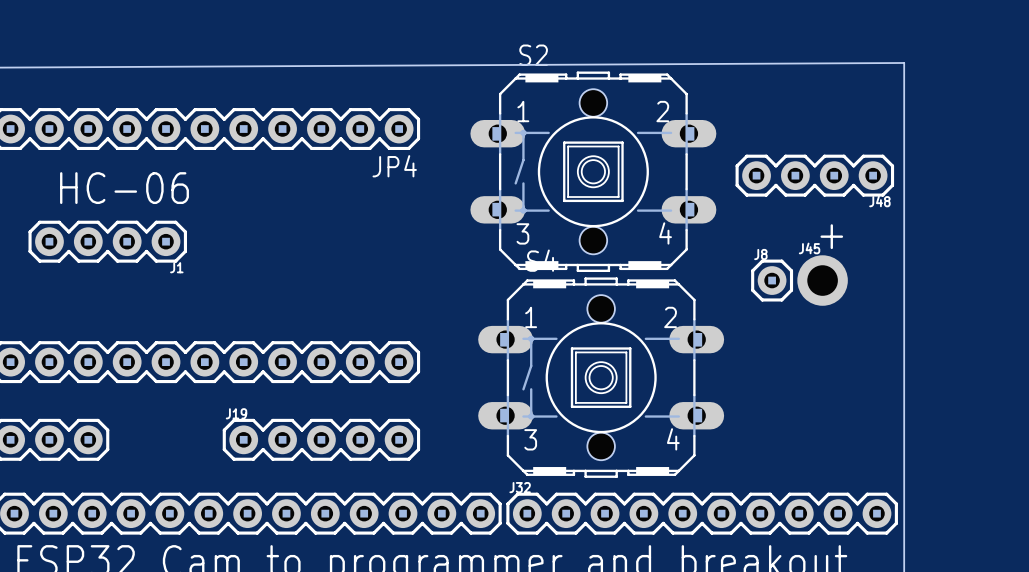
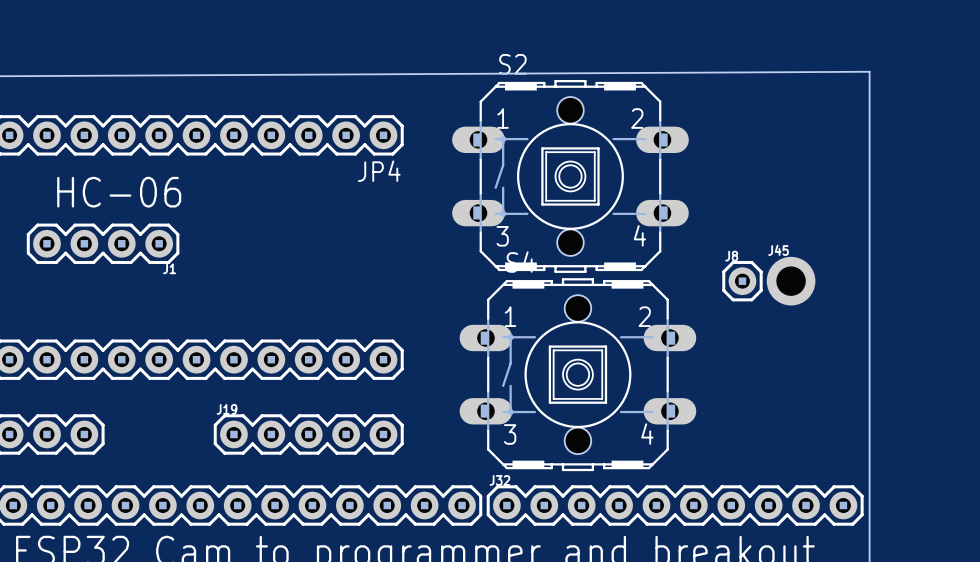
J48: (814, 175) -> none
text: + (831, 236) -> none

